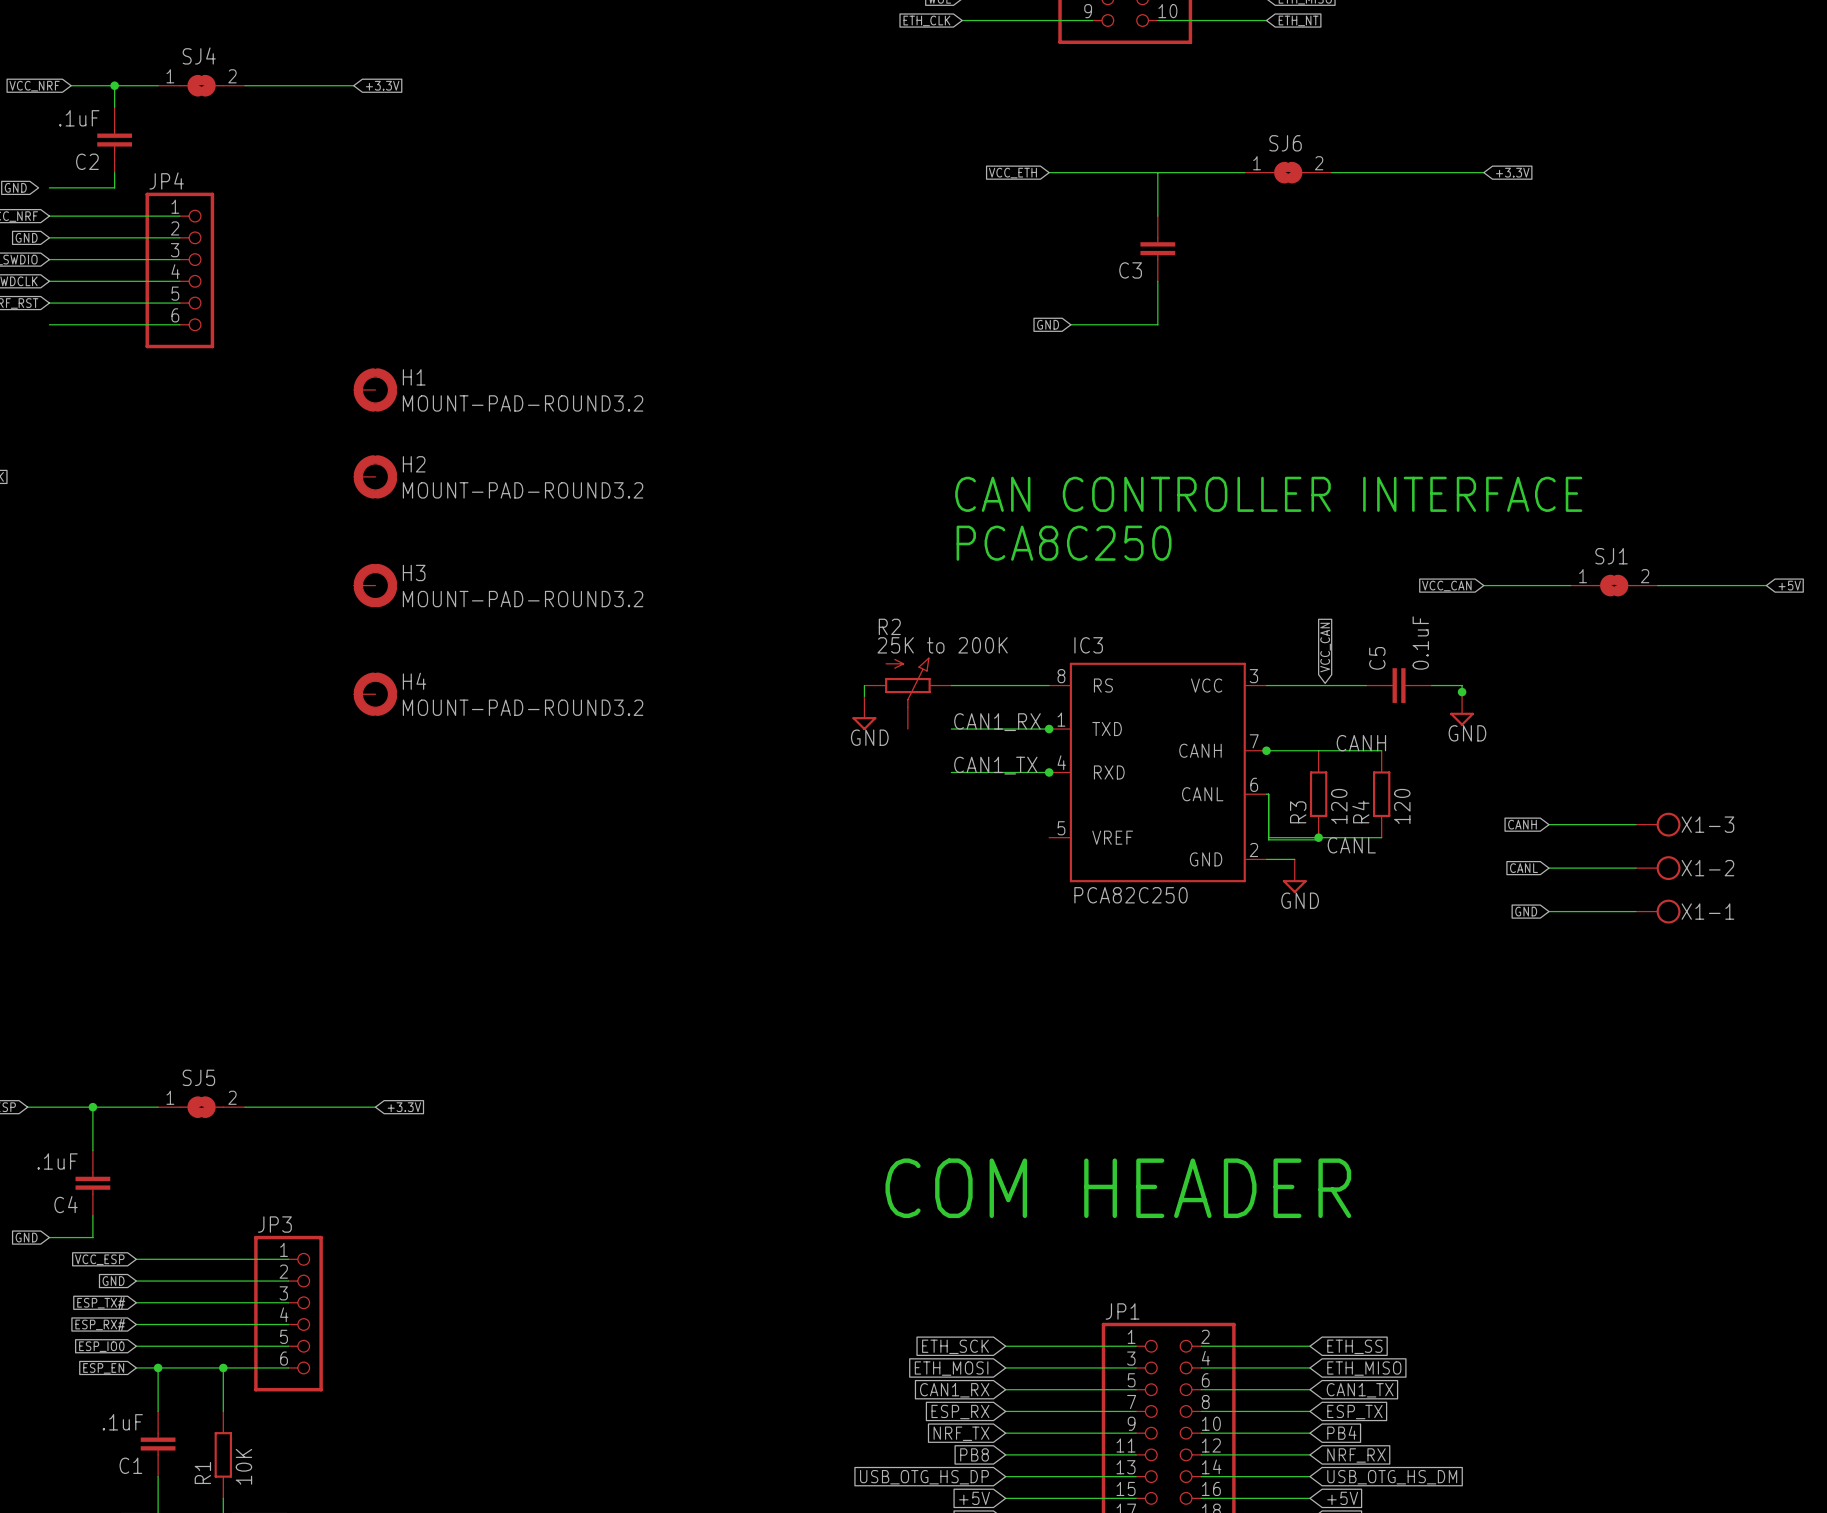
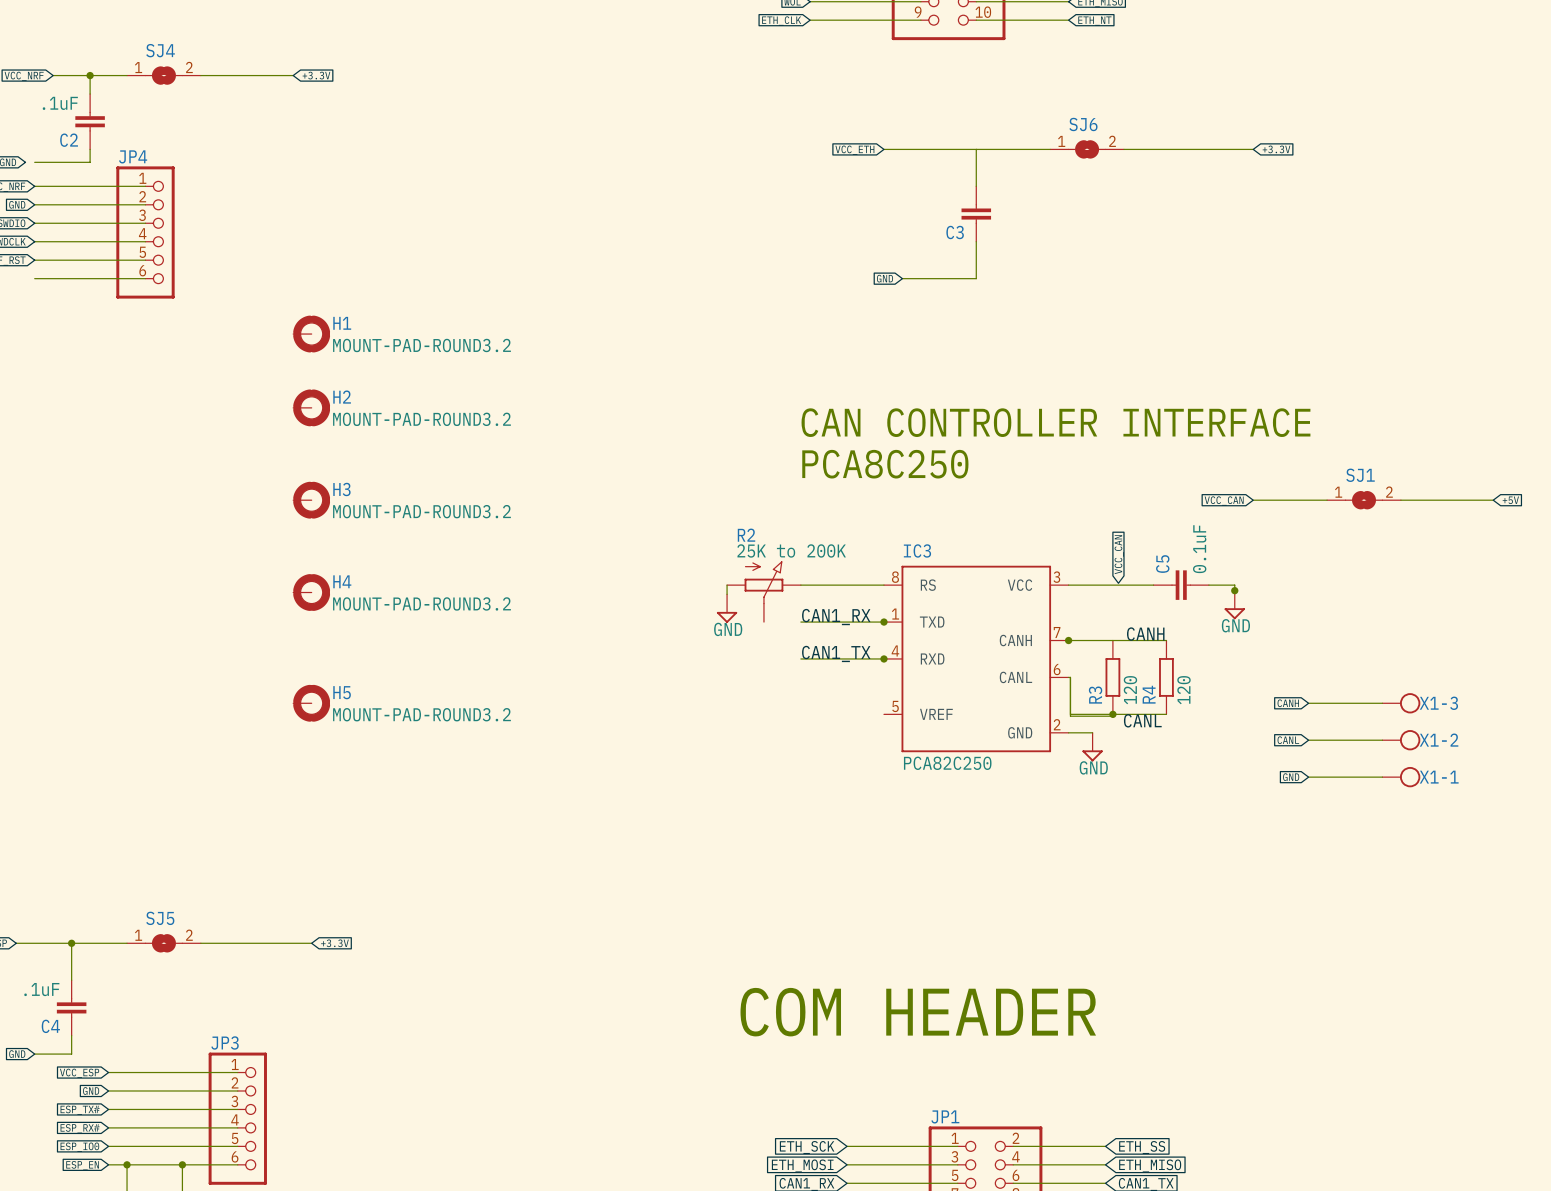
H5: none -> MOUNT-PAD-ROUND3.2 (311, 703)

